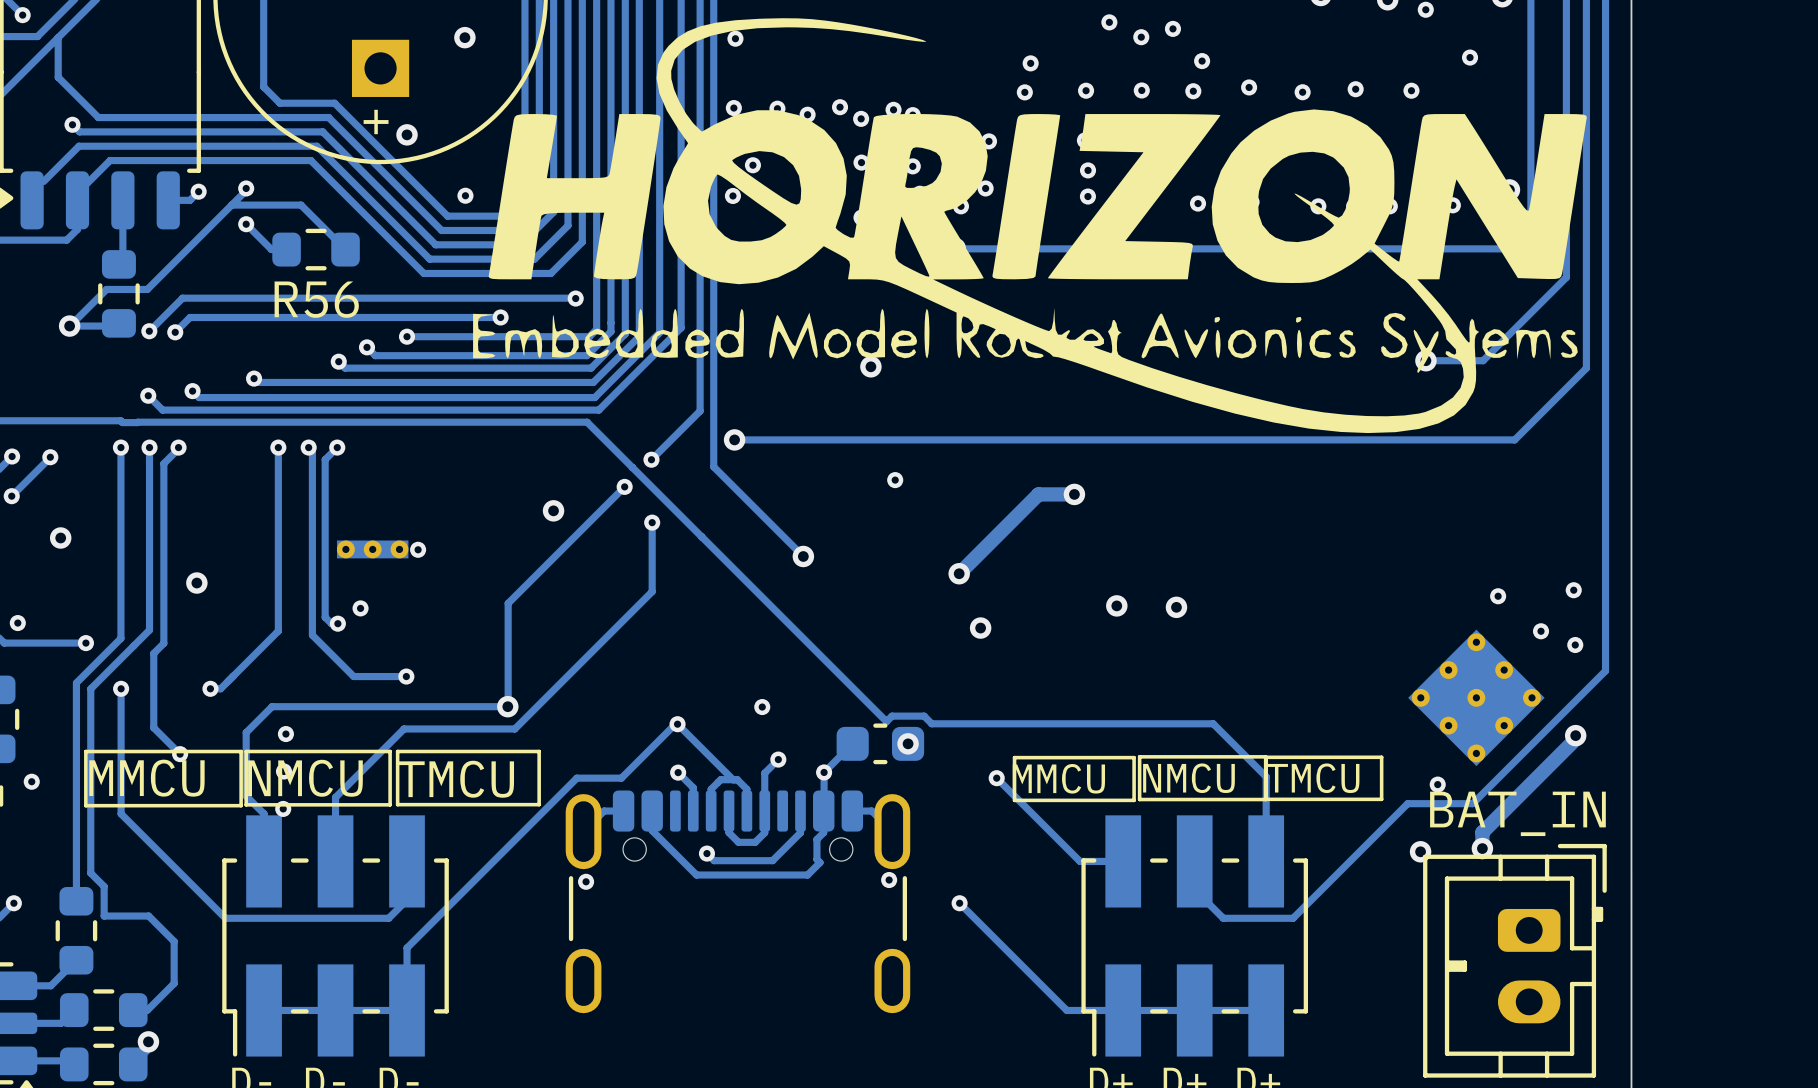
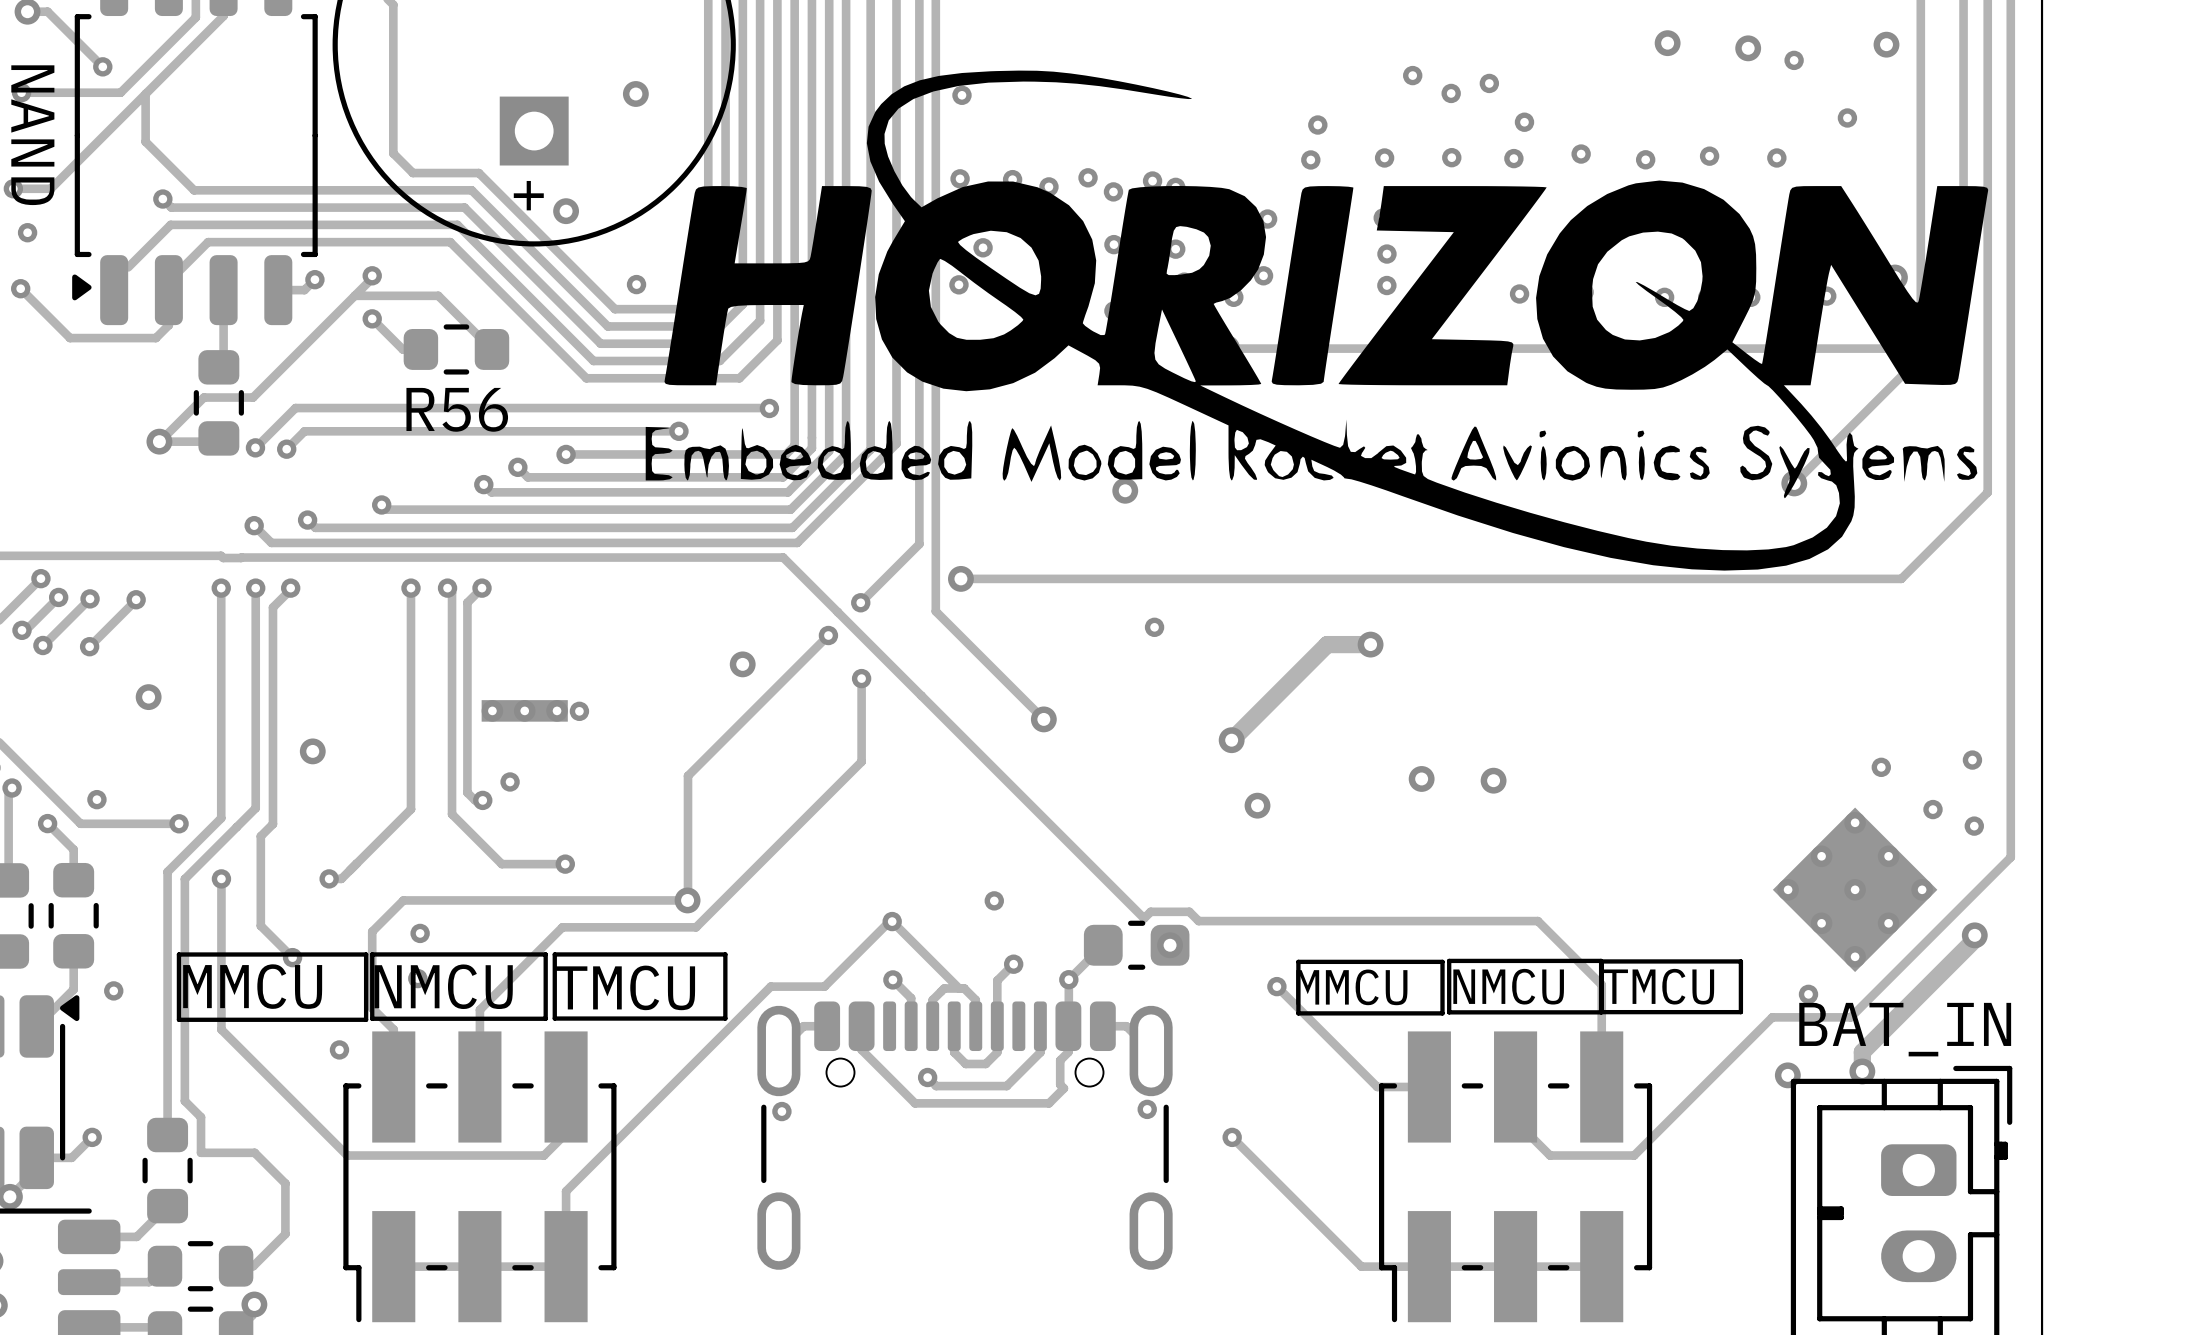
track: (1566, 220) (1566, 277) (1483, 360) (1425, 360) -> (1963, 314) (1794, 483)
via position: (283, 808) -> (339, 1049)

